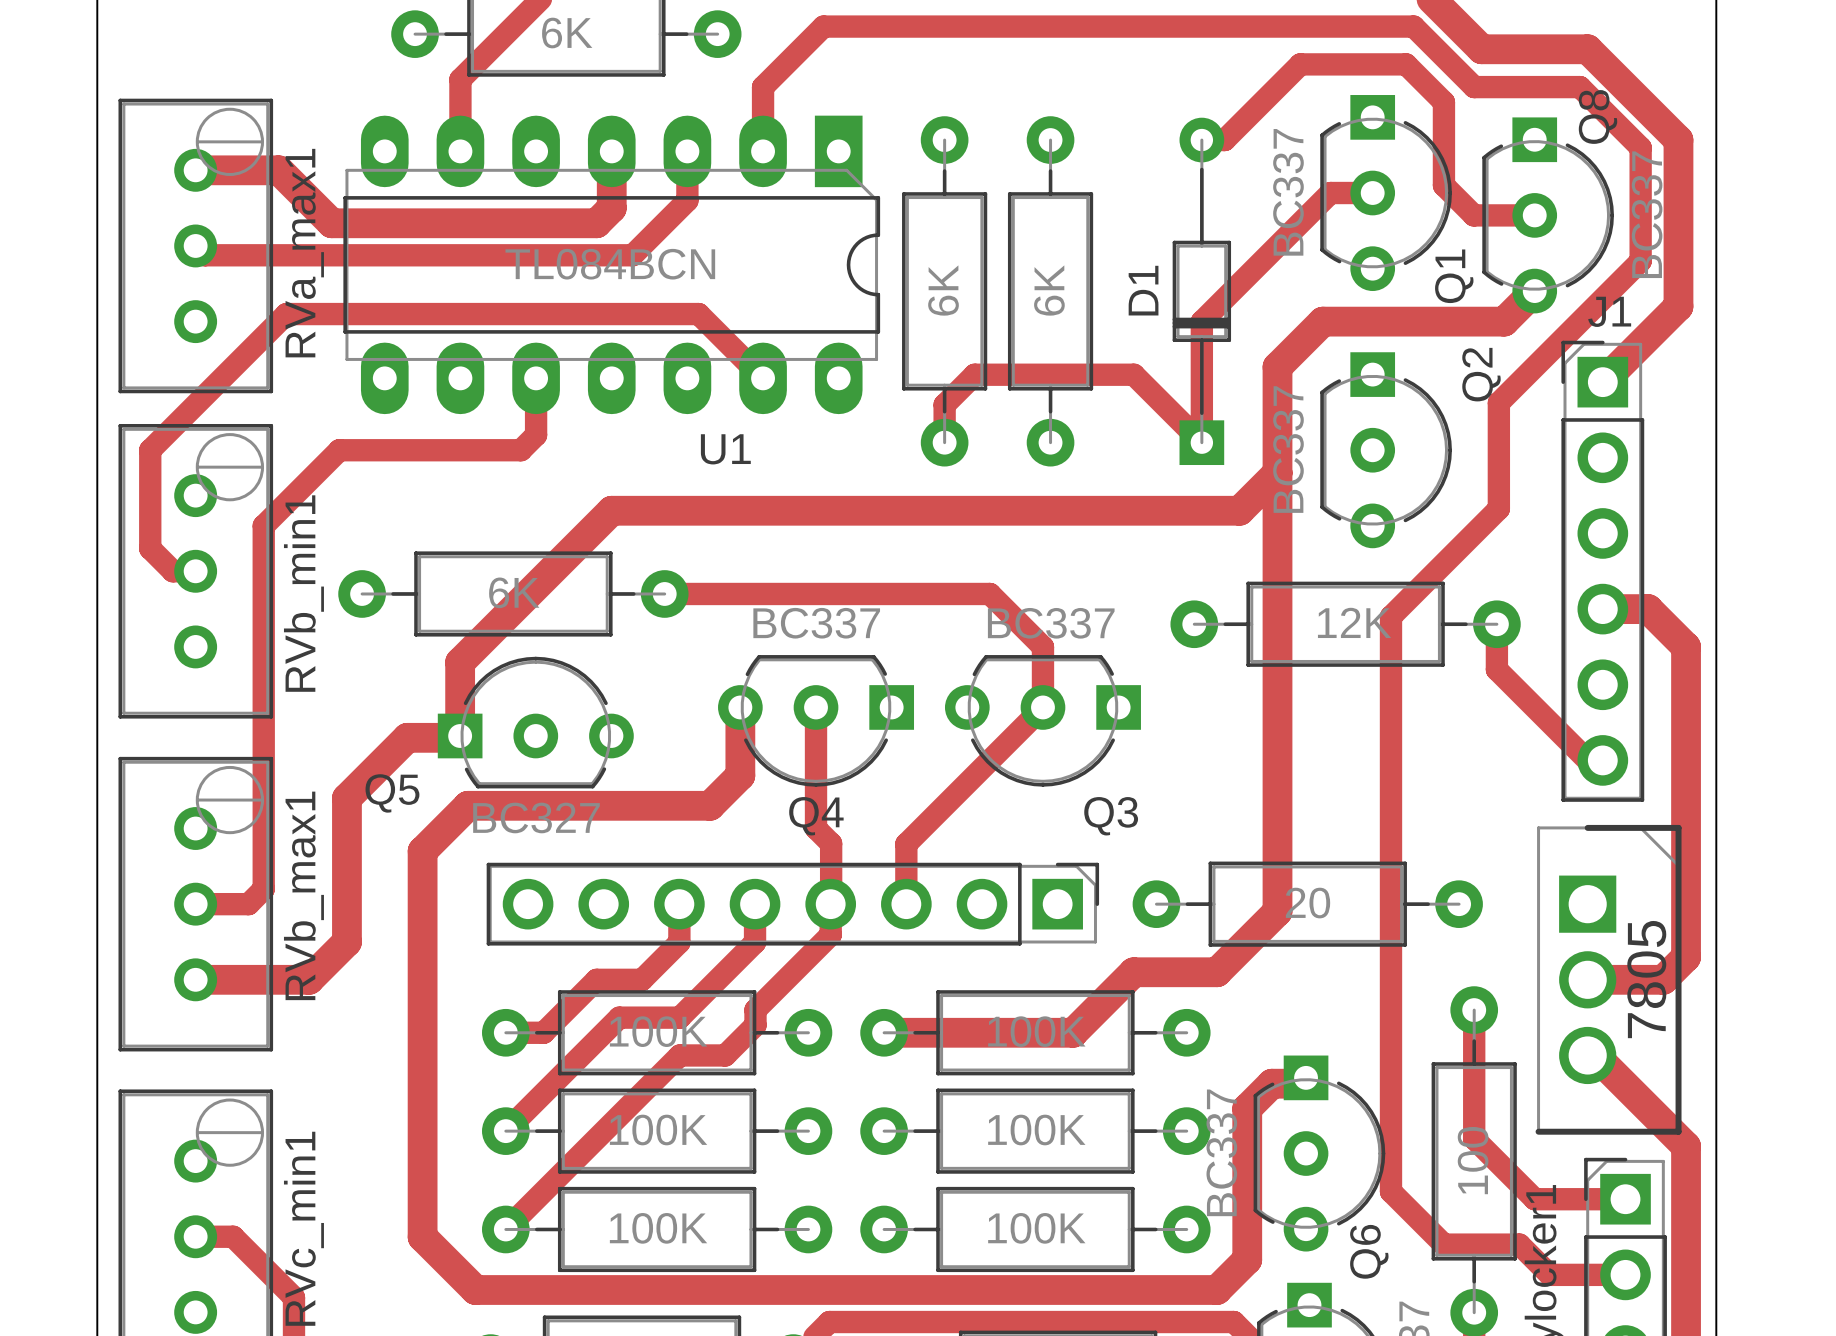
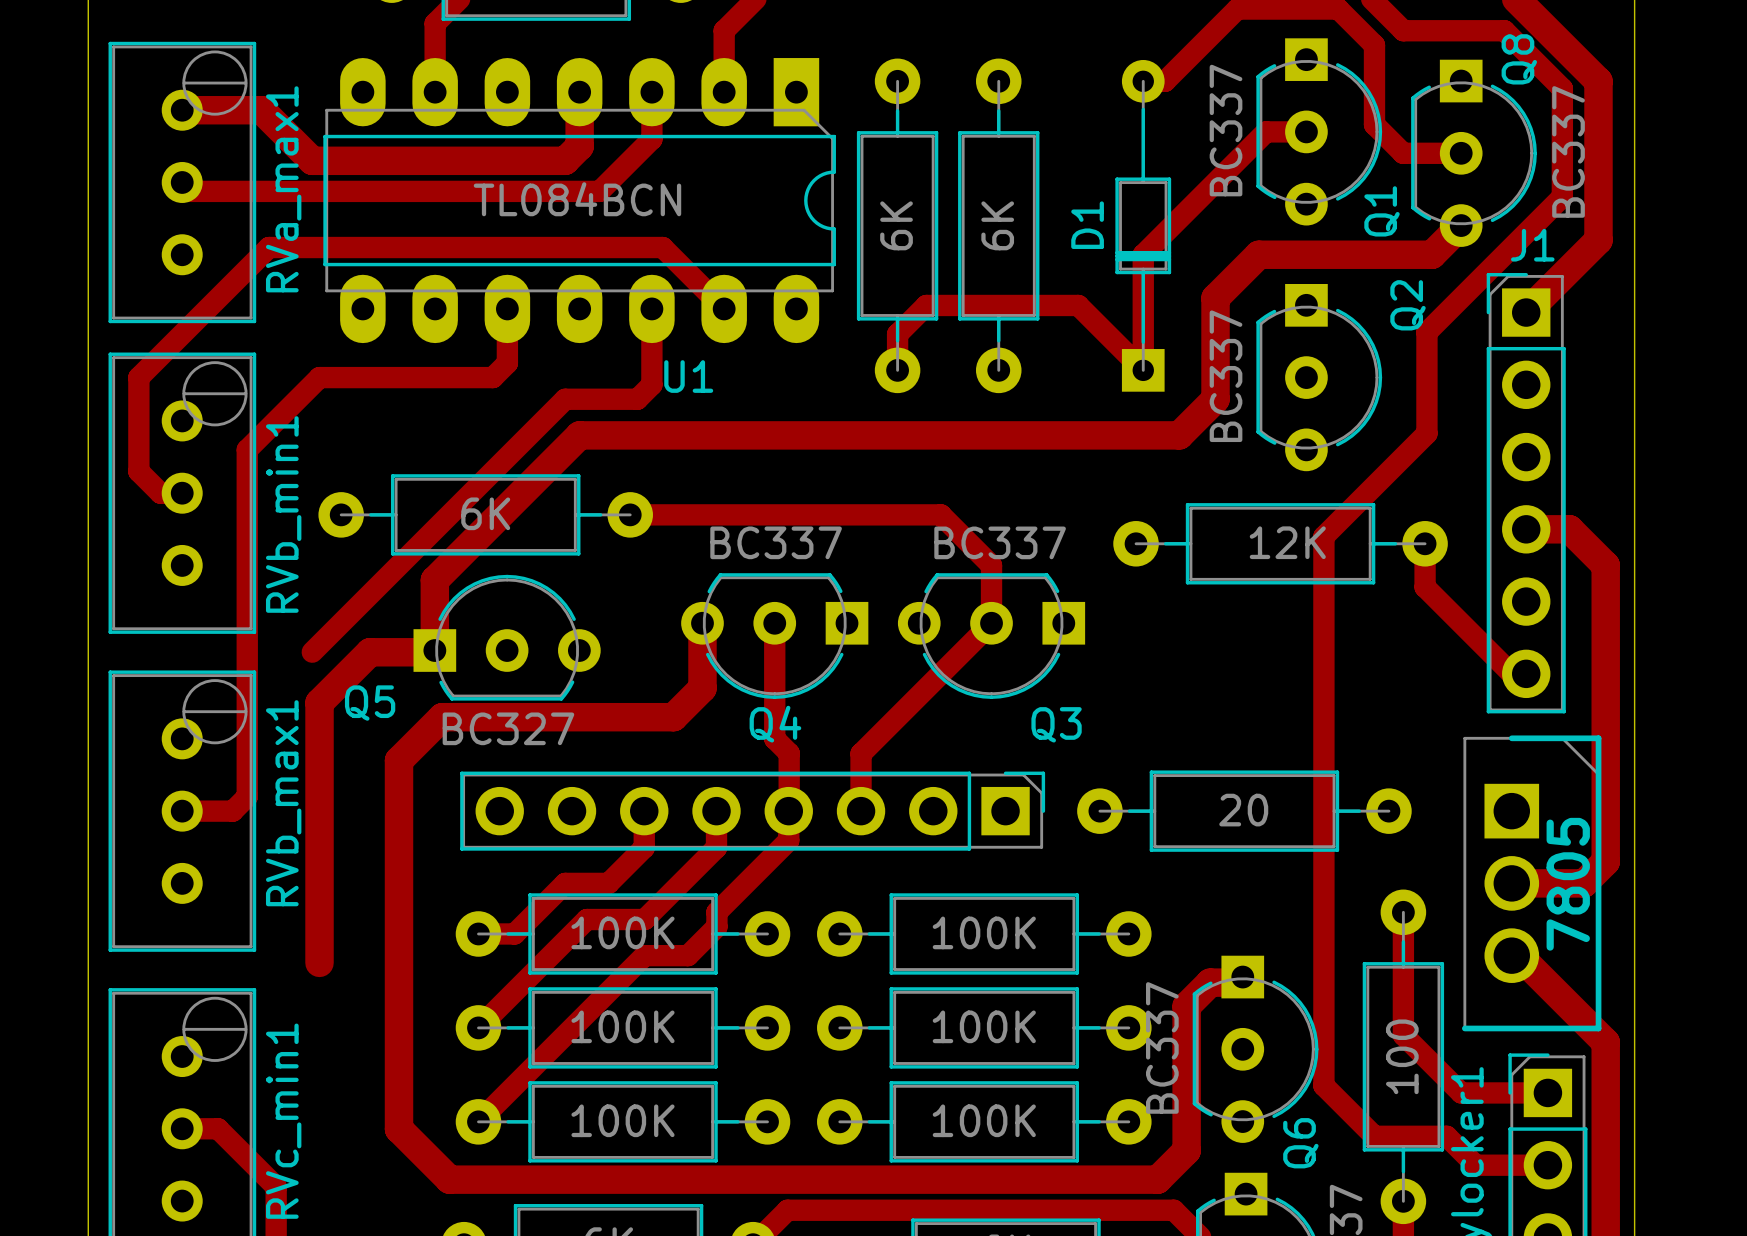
track: none -> (651, 308) (651, 384) (637, 399) (565, 399) (312, 652)
track: (1277, 472) (1277, 911) (1216, 972) (1133, 972) (1073, 1032) (884, 1032) -> none
track: (407, 737) (346, 798) (346, 941) (309, 979) (195, 979) -> (384, 652) (369, 652) (319, 702) (319, 962)

